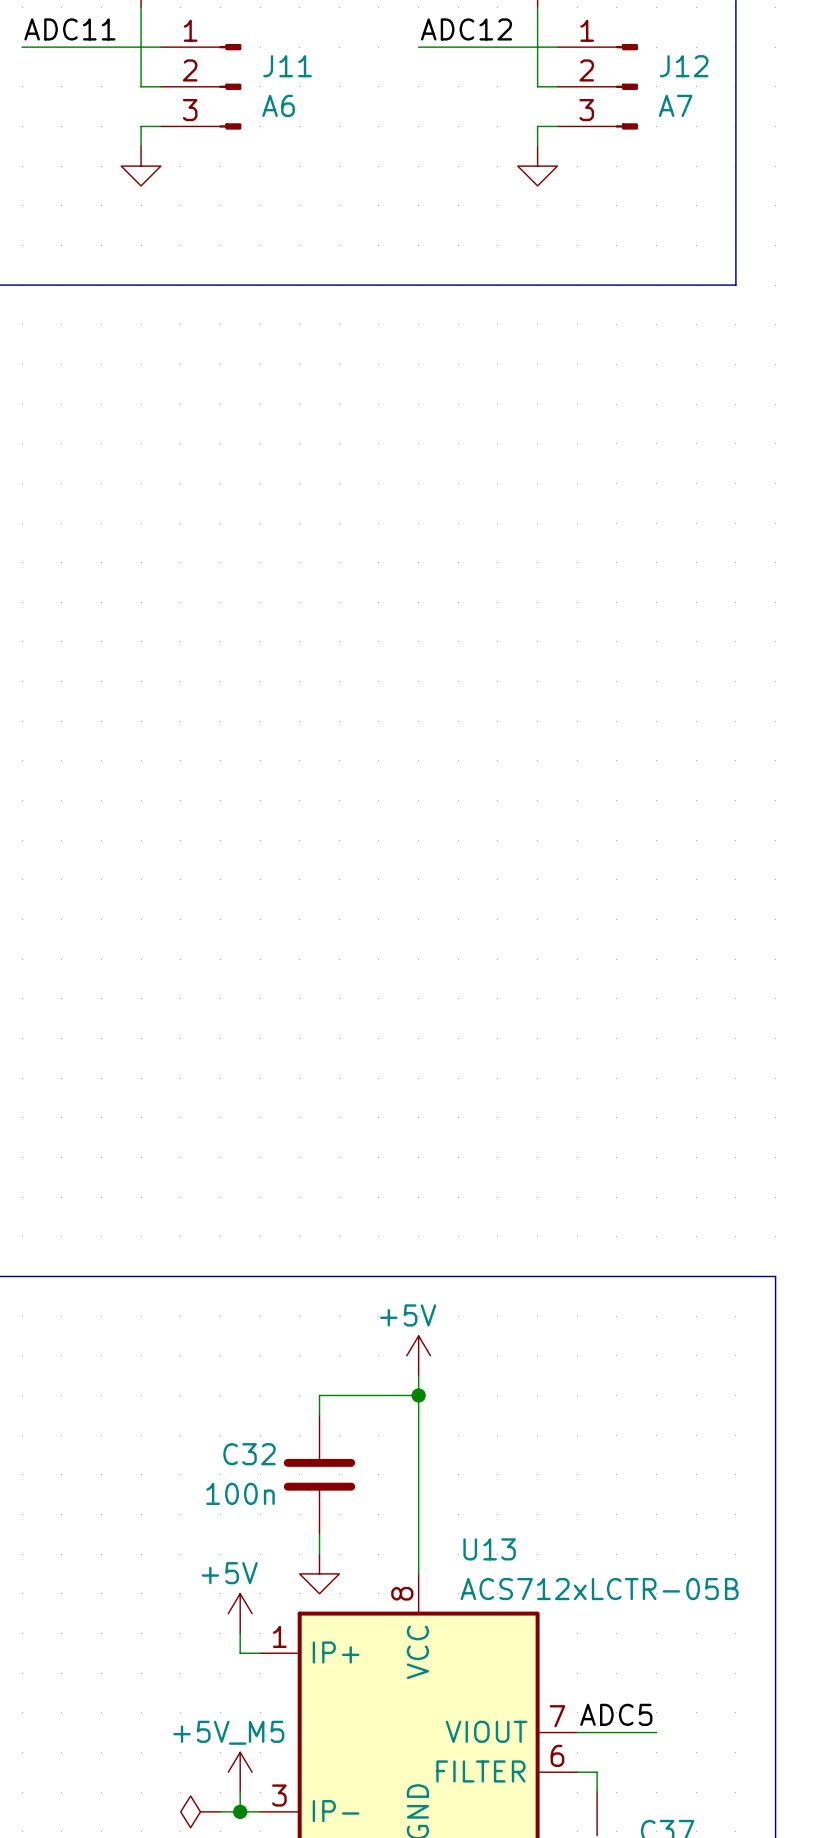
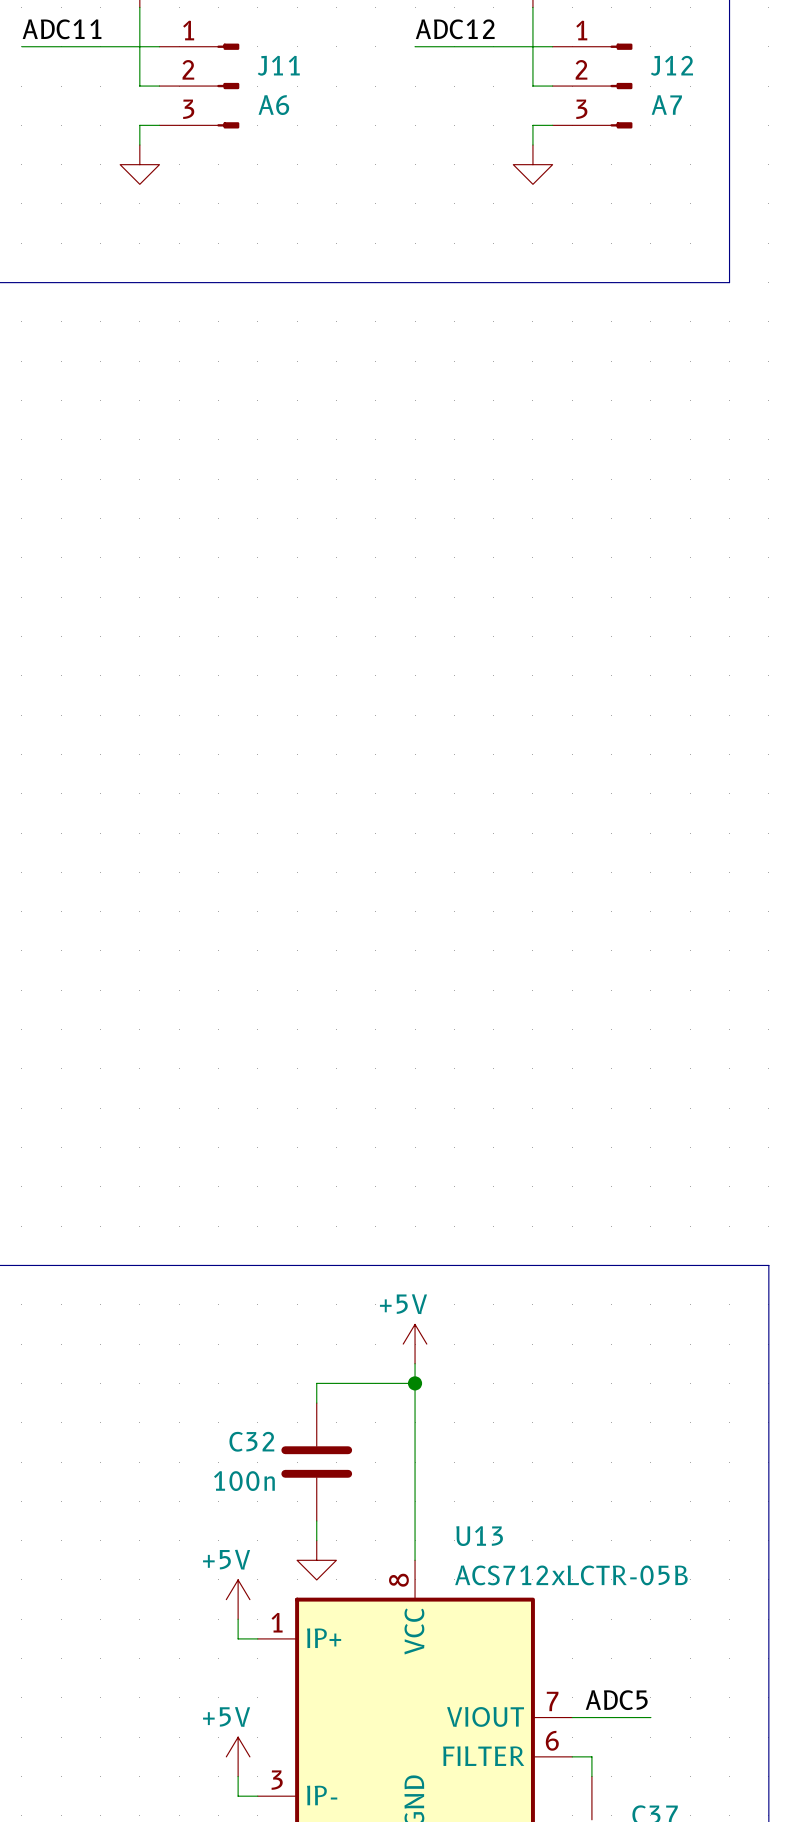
power symbol: +5V_M5 (240, 1772) -> +5V (238, 1756)
power symbol: (200, 1811) -> none
wire: (220, 1811) (240, 1811) -> none
junction: (240, 1811) -> none

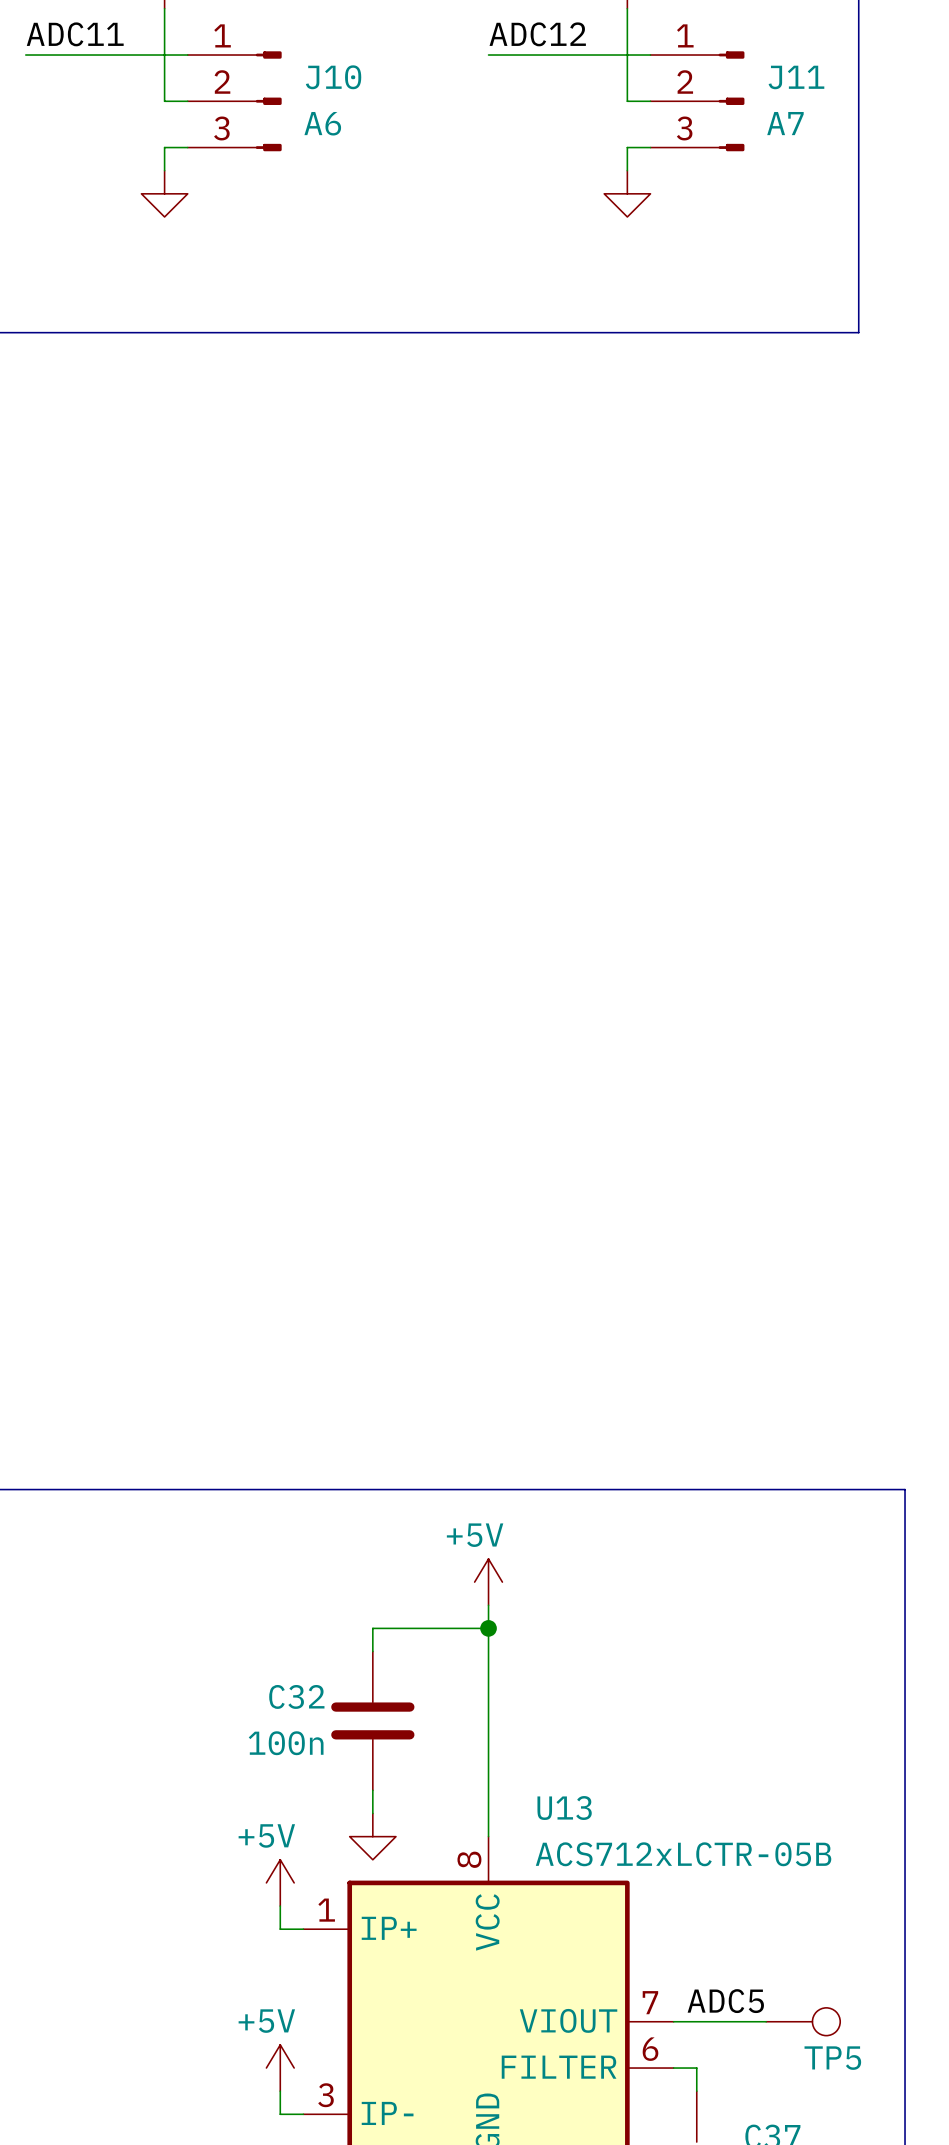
J11 name: J11 (278, 65) -> J10 (333, 77)
J12 name: J12 (671, 65) -> J11 (796, 77)
TP5: none -> (803, 2021)

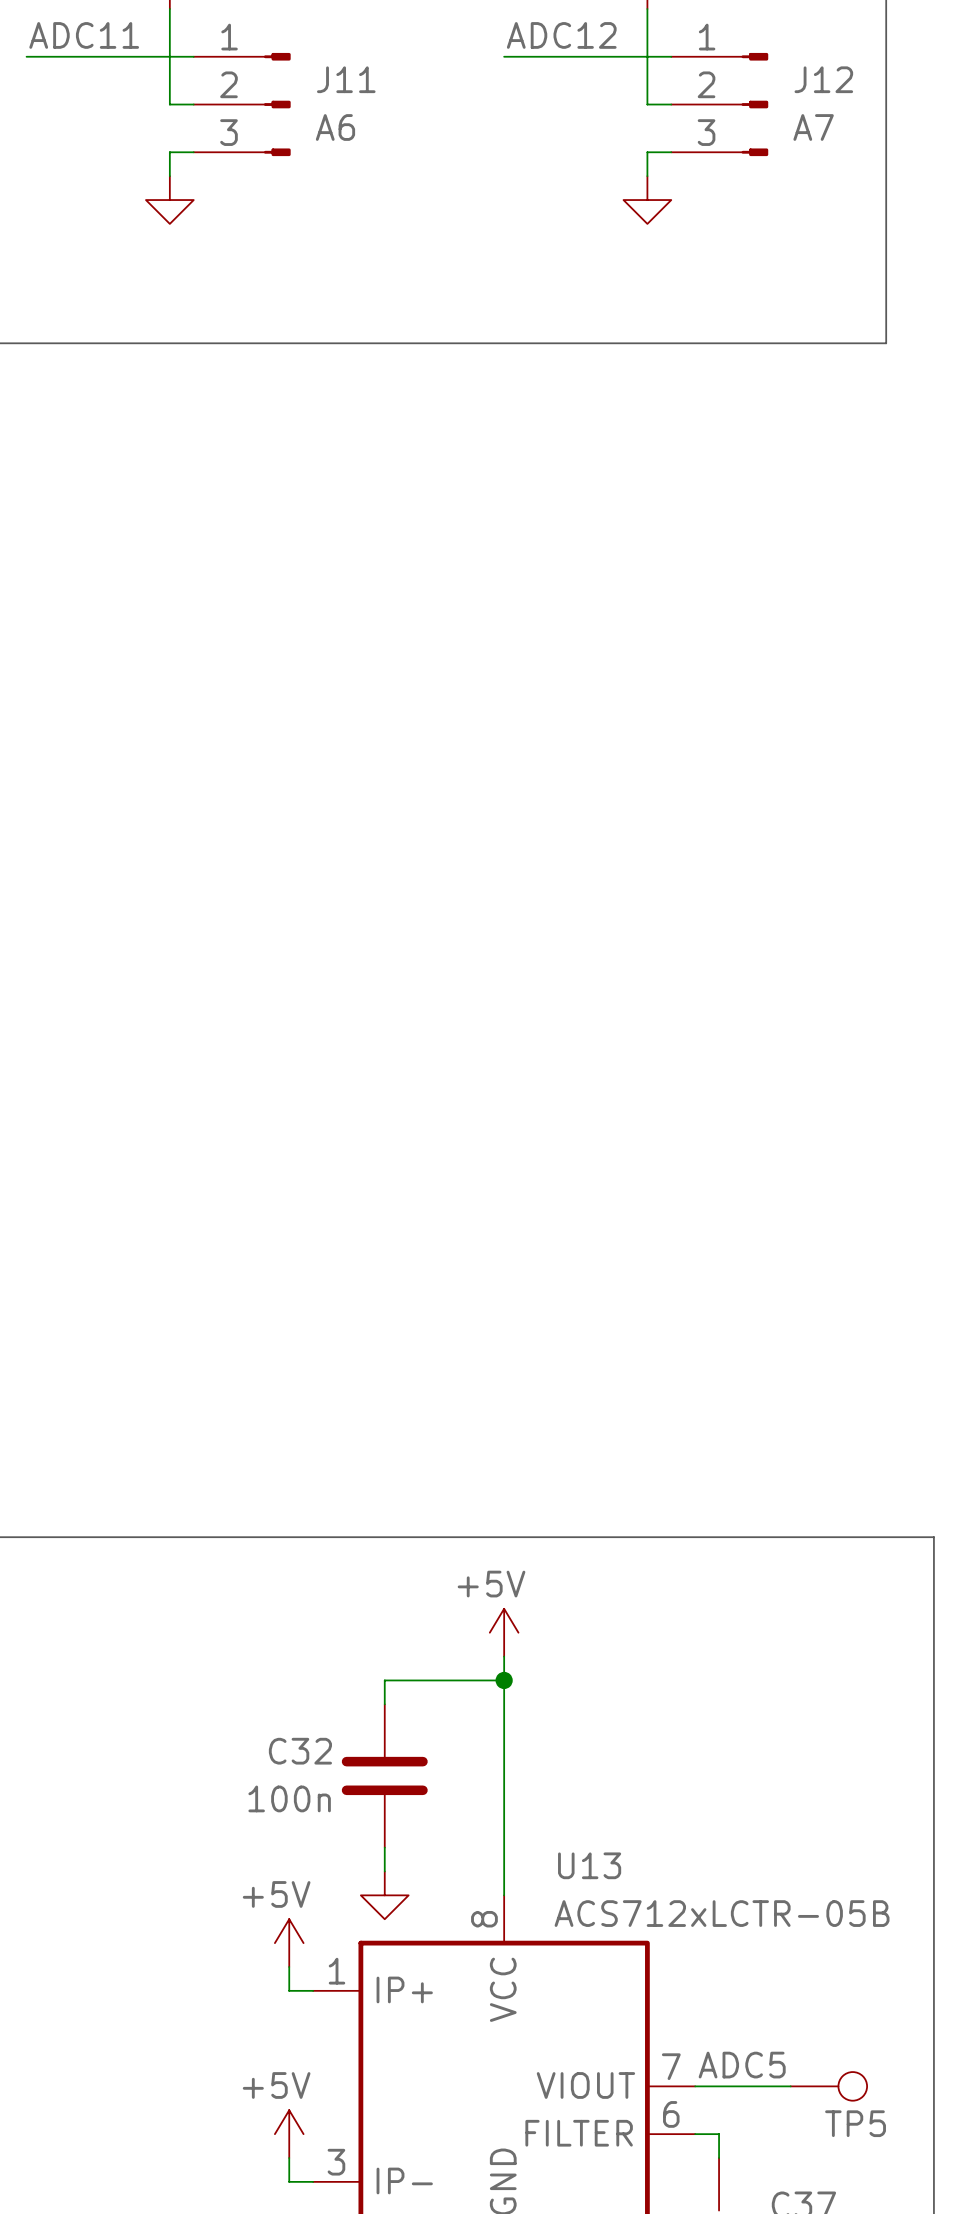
J10 name: J10 (333, 77) -> J11 (346, 79)
J11 name: J11 (796, 77) -> J12 (823, 79)

